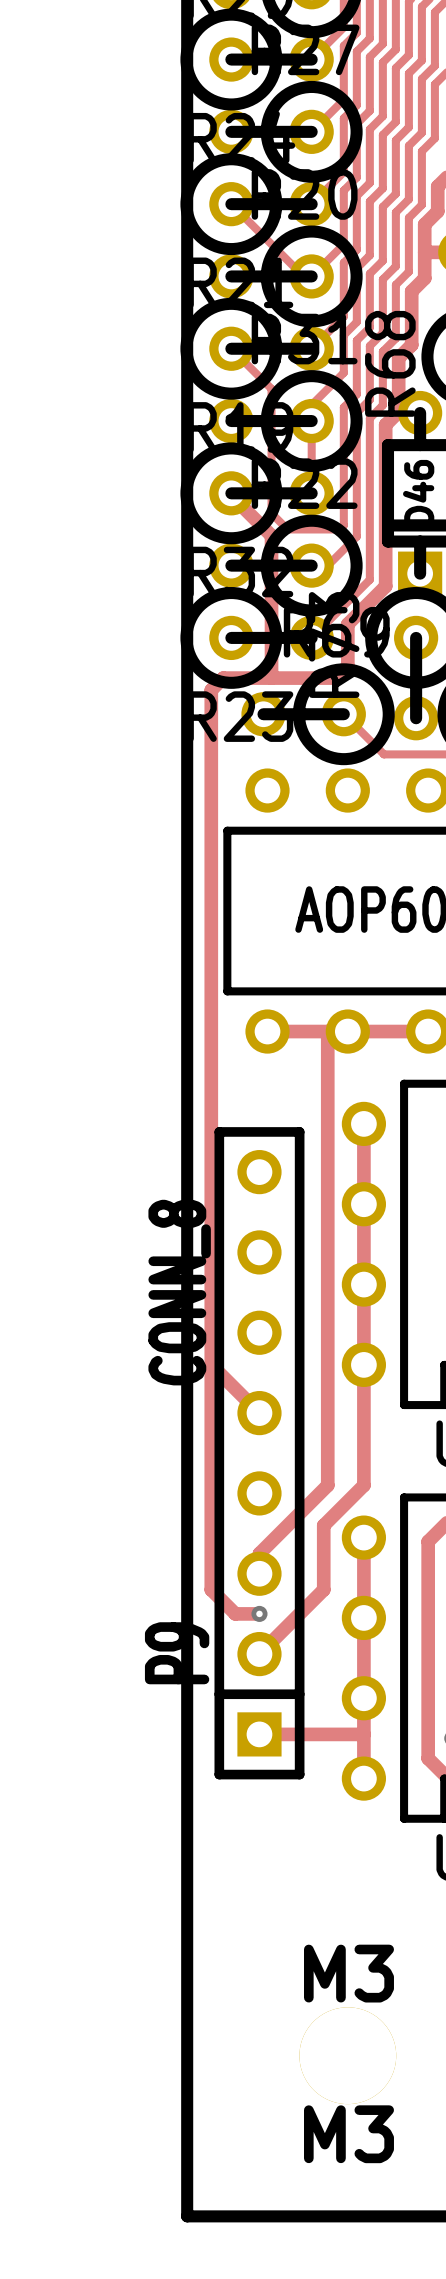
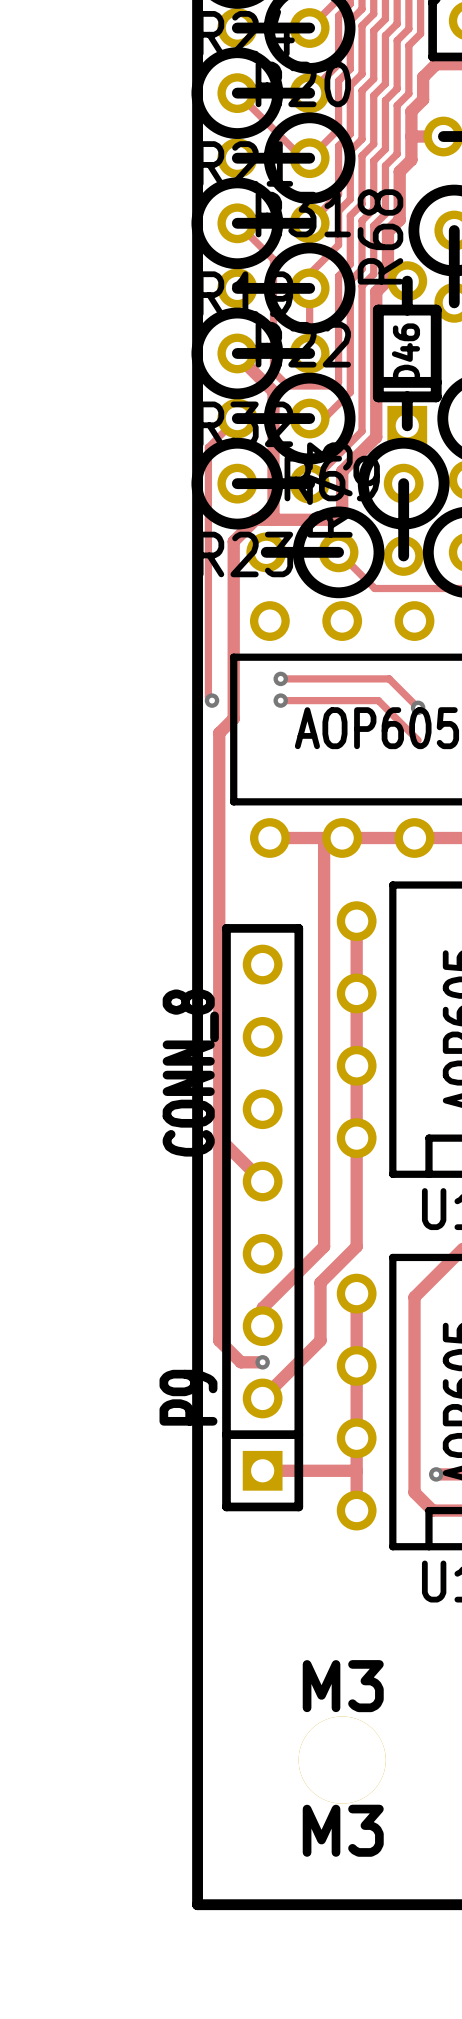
track: none -> (237, 418) (208, 447) (208, 696) (212, 700)
track: (251, 678) (223, 678) (211, 690) (211, 915) -> (255, 519) (233, 541) (233, 718) (219, 733)
track: none -> (280, 678) (389, 678) (418, 707)
via: none -> (280, 678)
via: none -> (212, 700)
track: none -> (280, 700) (378, 700) (418, 740)
via: none -> (280, 700)
via: none -> (418, 707)

